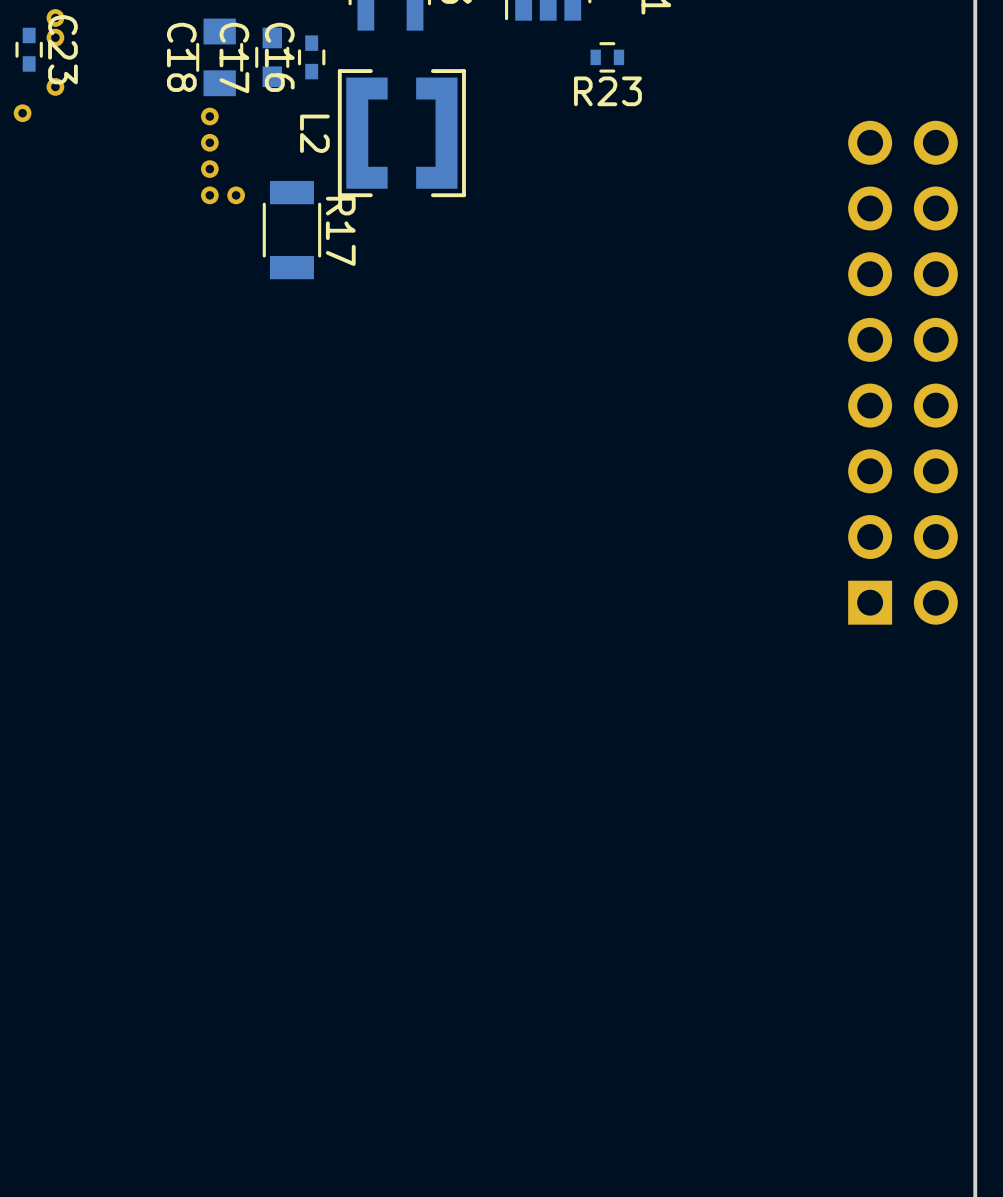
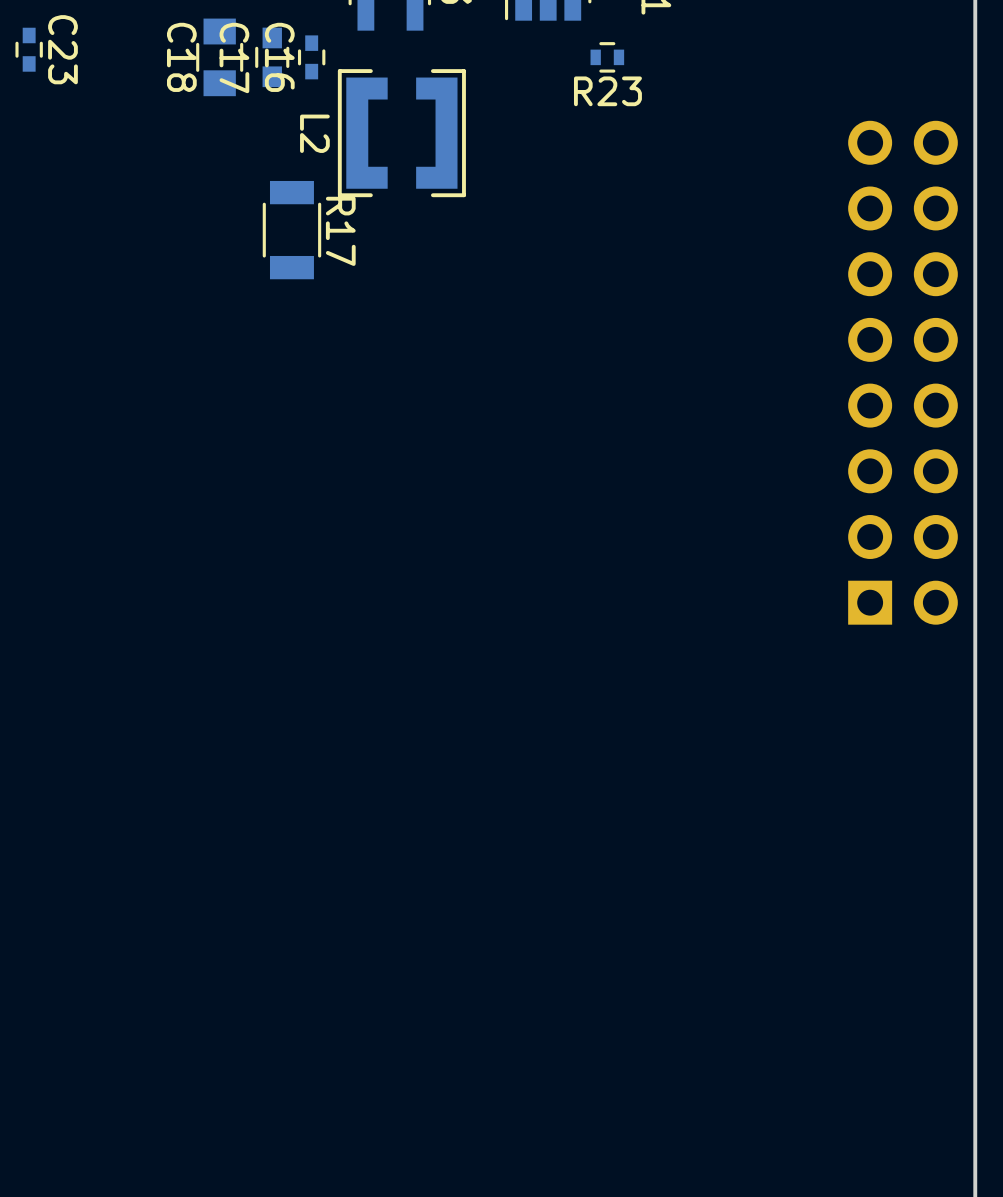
part: (55, 17) -> none
part: (55, 37) -> none
part: (55, 86) -> none
part: (22, 113) -> none
part: (209, 116) -> none
part: (209, 142) -> none
part: (209, 169) -> none
part: (209, 195) -> none
part: (236, 195) -> none

